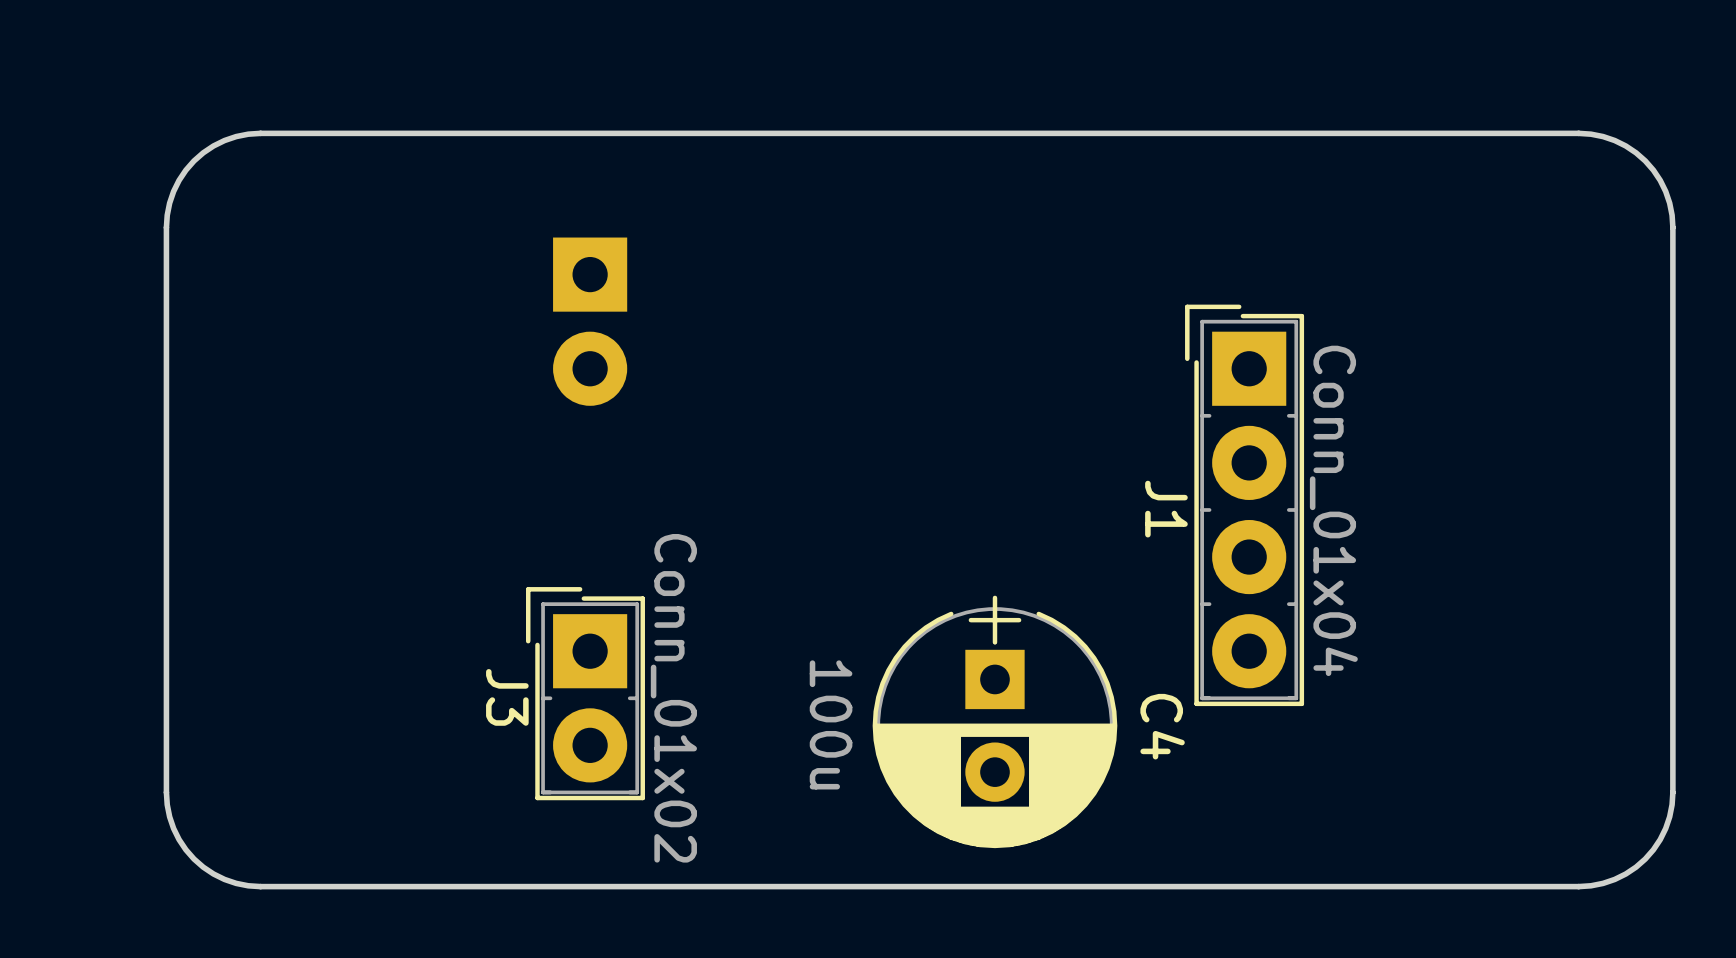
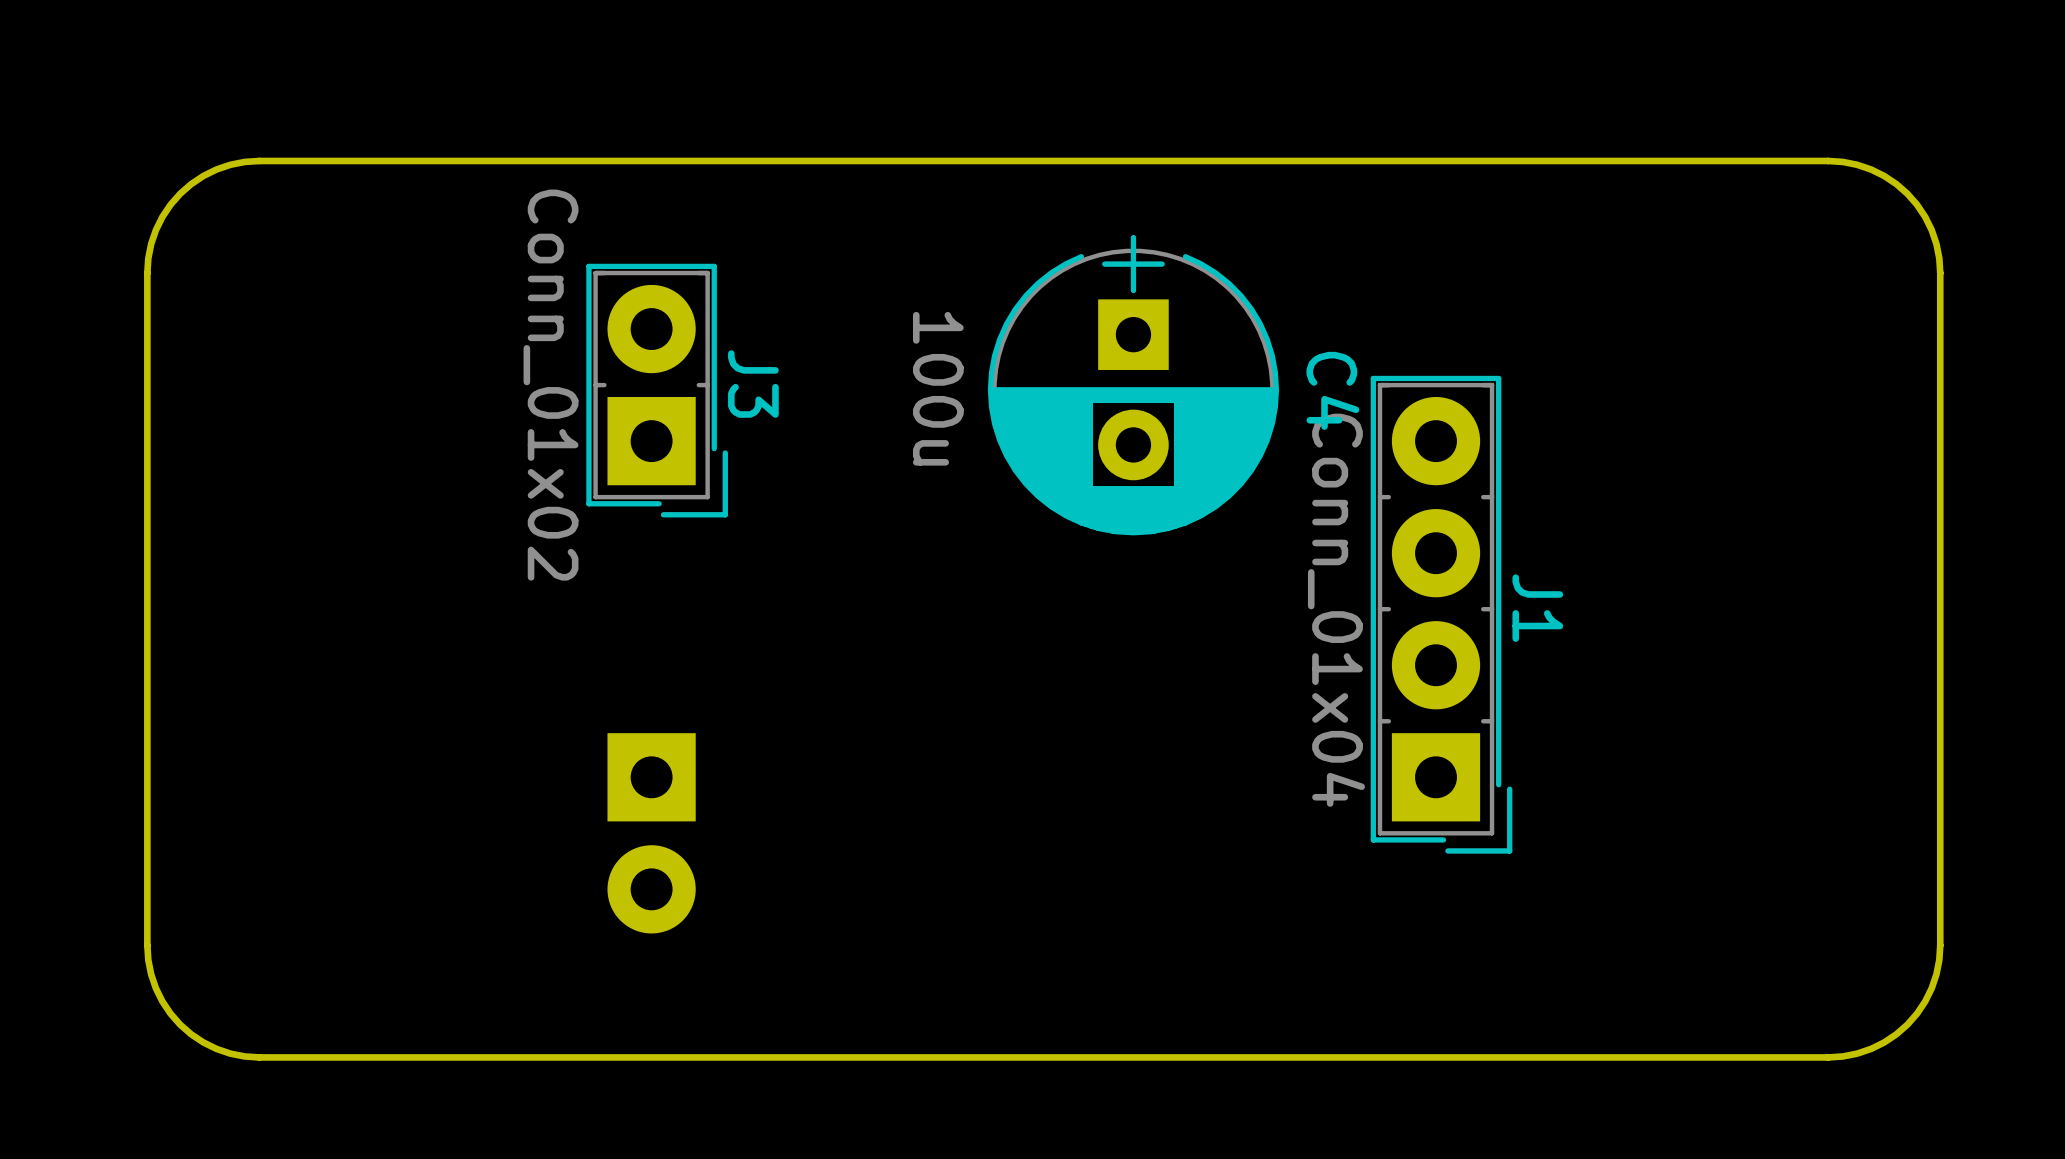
part position: (590, 321) -> (651, 833)
J1 rotation: 0° (1244, 505) -> 180° (1441, 614)
J3 rotation: 0° (585, 693) -> 180° (657, 390)
J3 position: (585, 693) -> (657, 390)
C4 position: (994, 721) -> (1133, 385)

